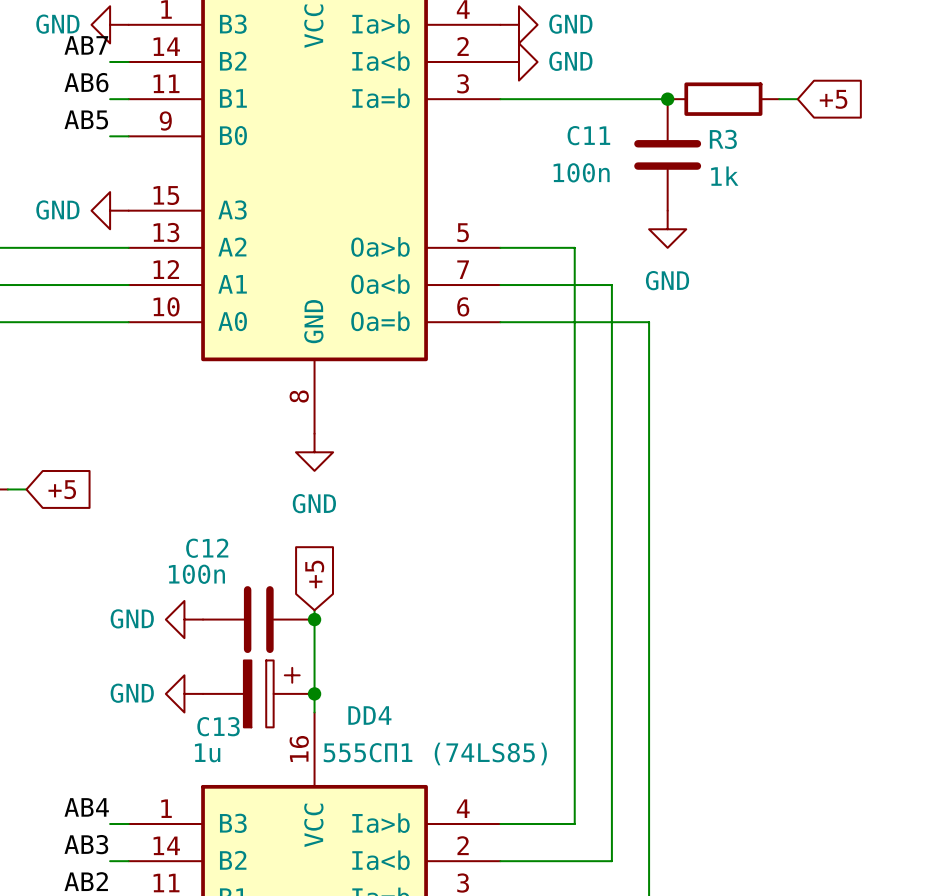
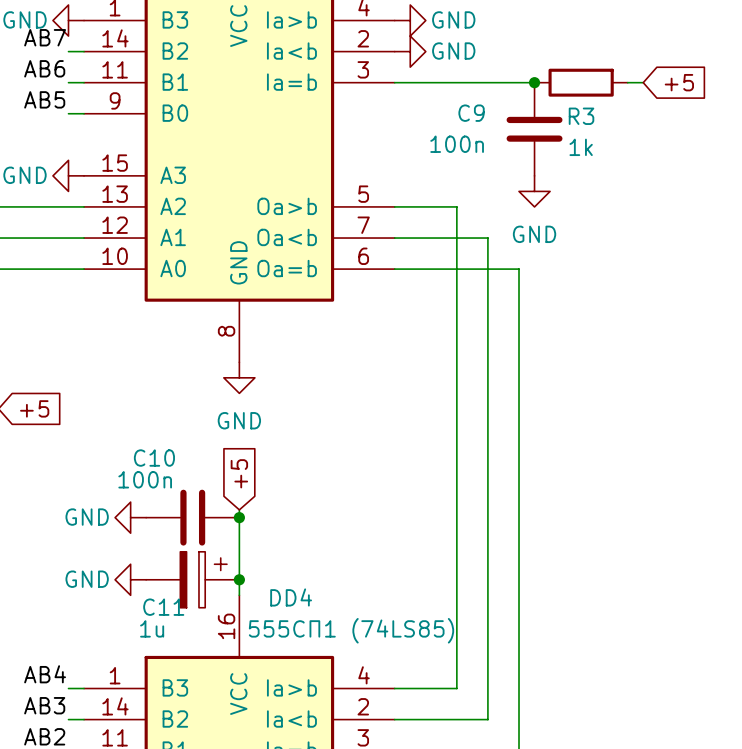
C11 name: C11 (588, 135) -> C9 (471, 113)
C12 name: C12 (207, 548) -> C10 (154, 458)
C13 name: C13 (218, 726) -> C11 (163, 607)

